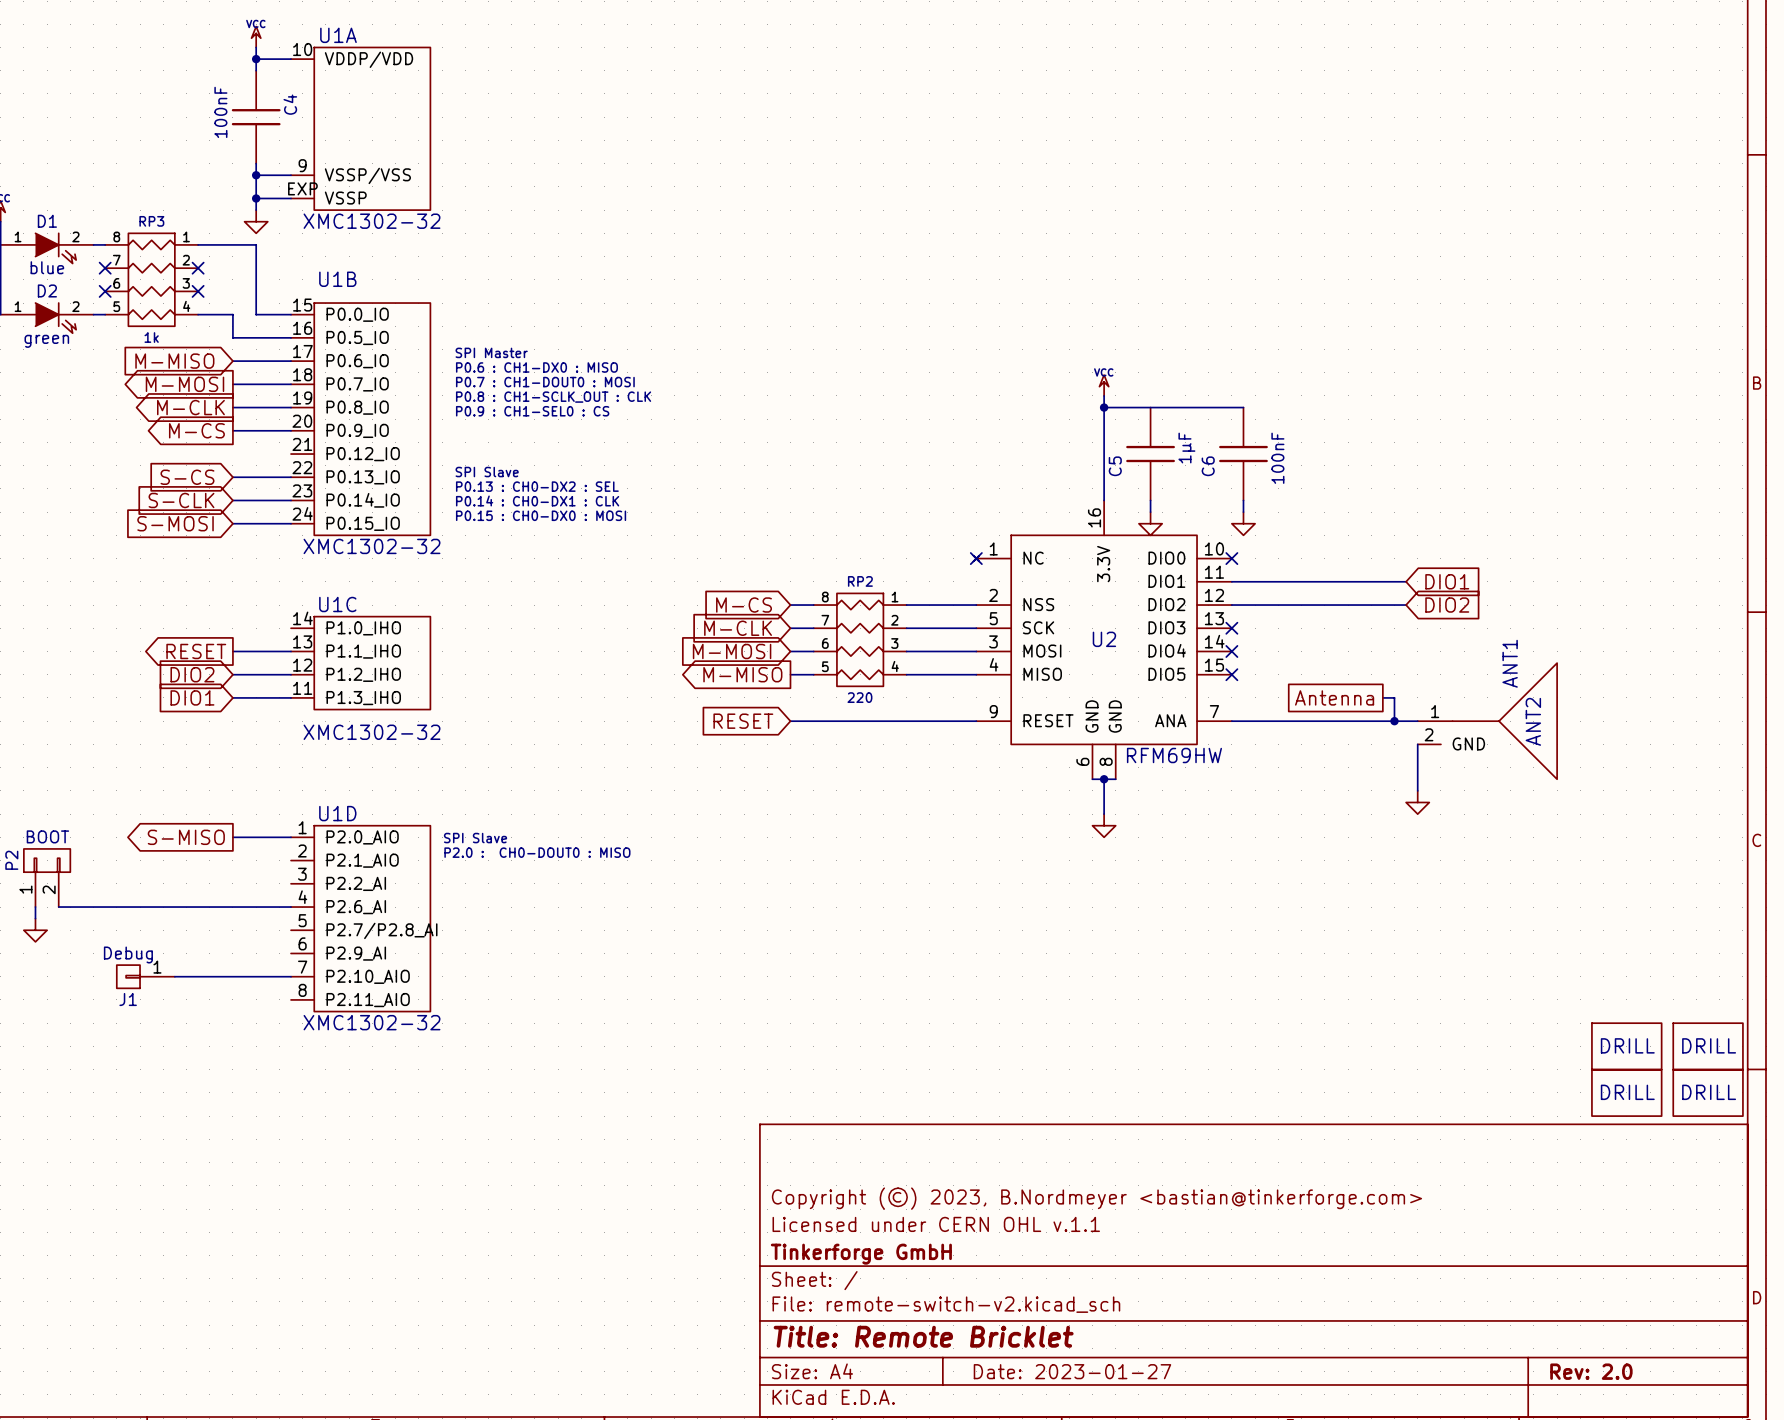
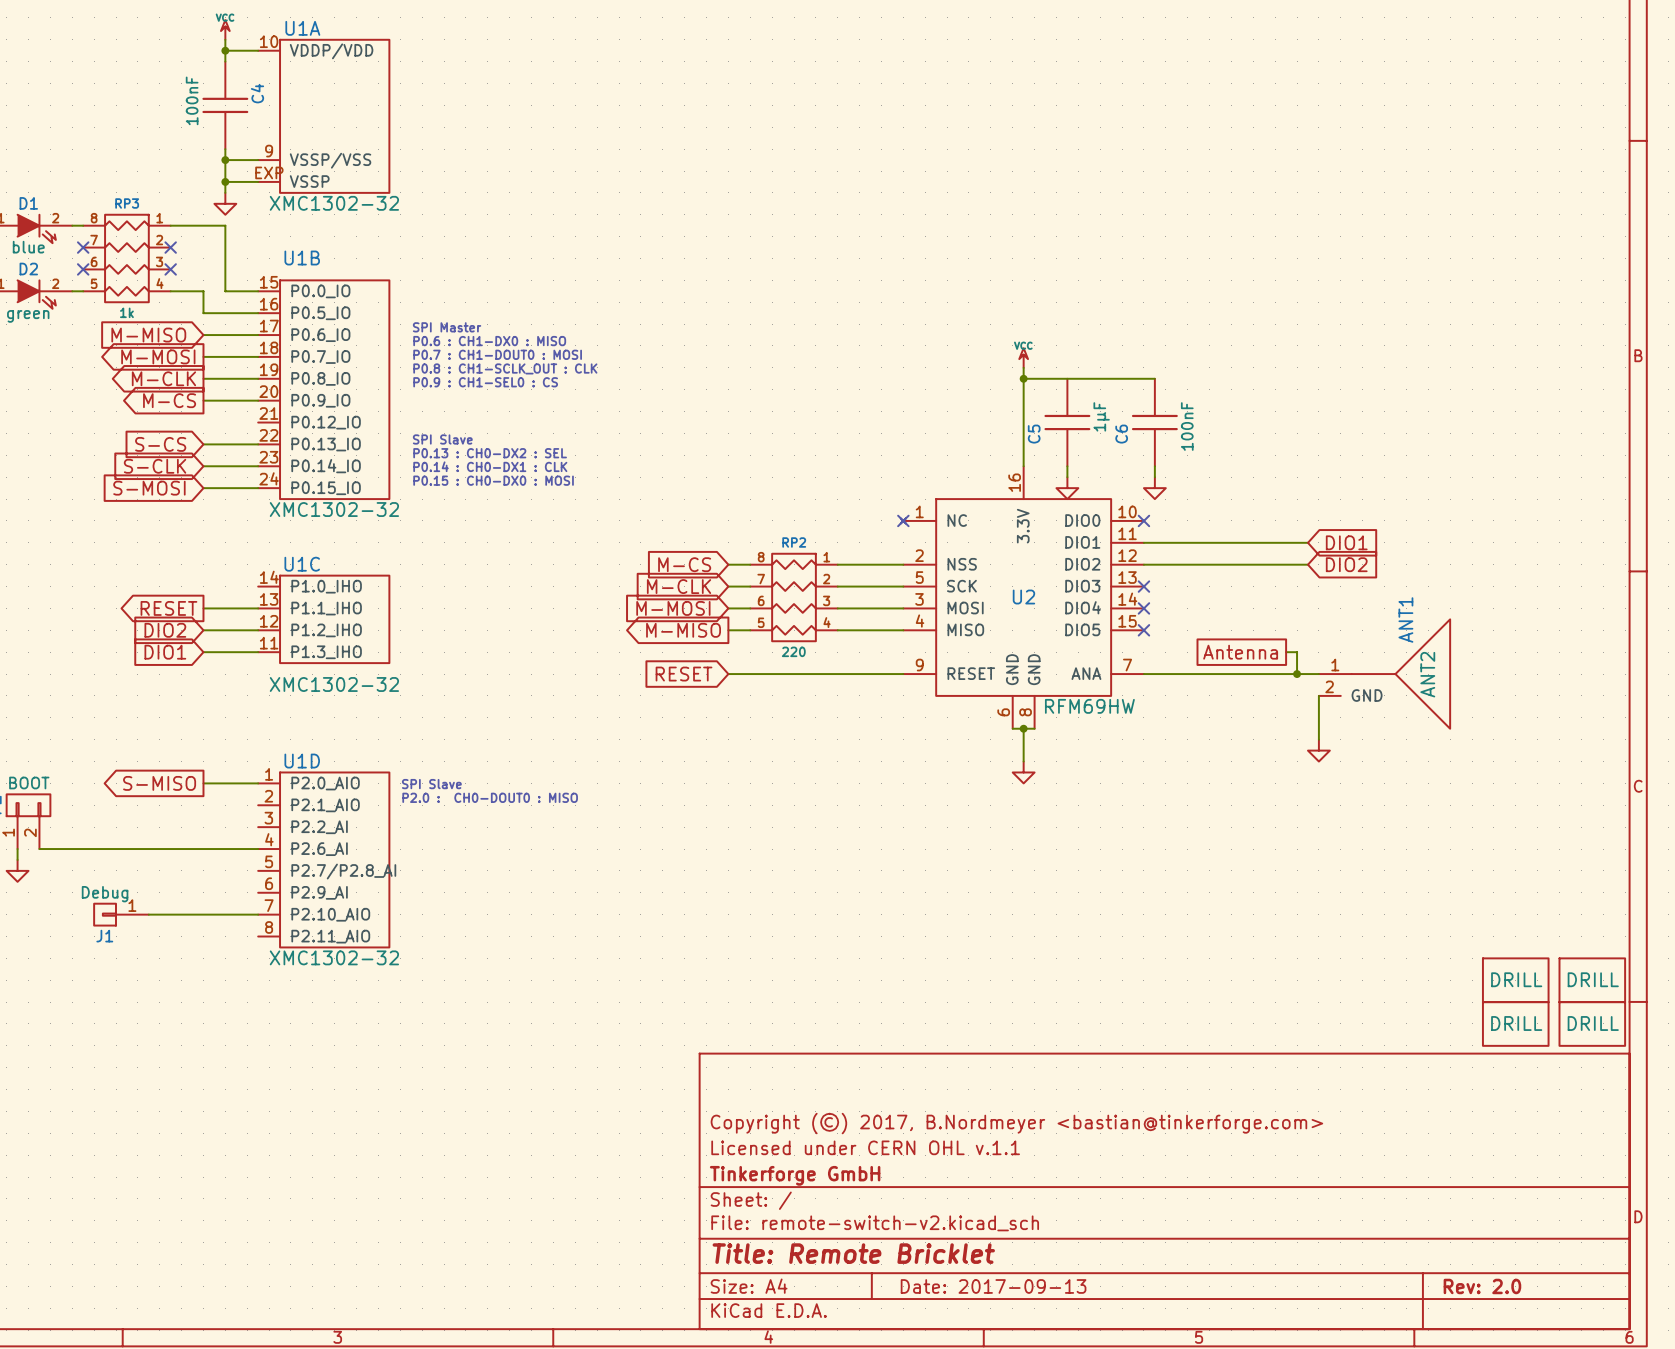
title block: Copyright (©) 2023, B.Nordmeyer <bastian@tinkerforge.com> (1096, 1198) -> Copyright (©) 2017, B.Nordmeyer <bastian@tinkerforge.com> (1016, 1123)
title block: Date: 2023-01-27 (1072, 1371) -> Date: 2017-09-13 (993, 1286)

